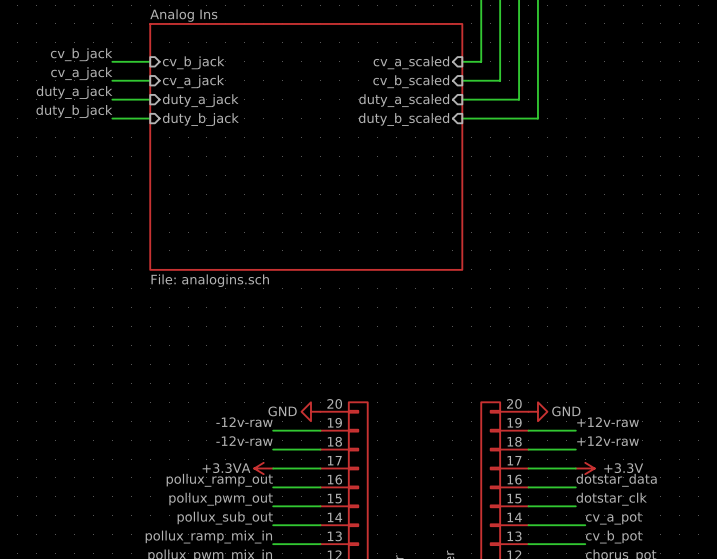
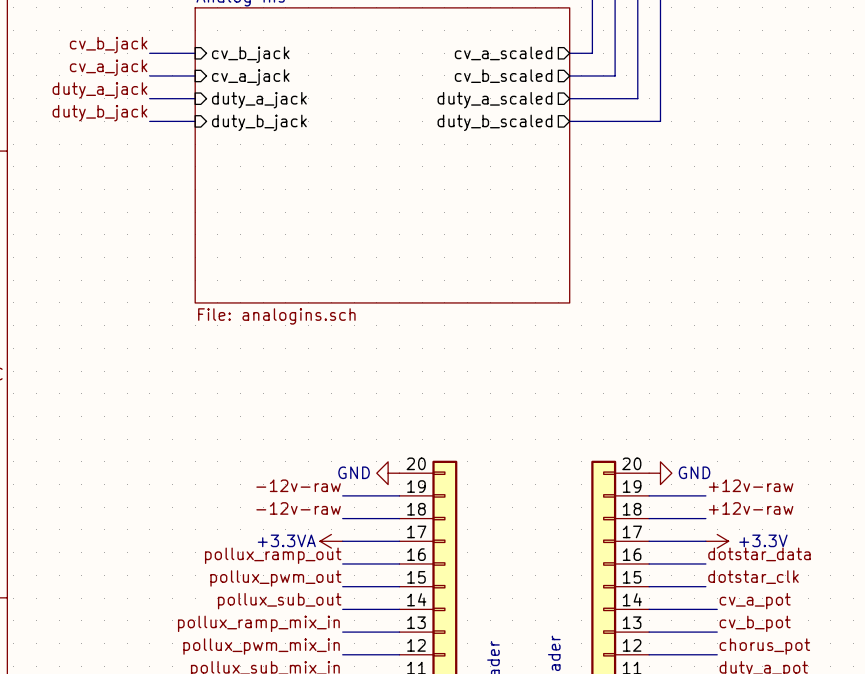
sheet pin shape: input (411, 62) -> output (503, 53)
sheet pin shape: input (411, 81) -> output (503, 76)
sheet pin shape: input (404, 100) -> output (494, 100)
sheet pin shape: input (404, 119) -> output (494, 122)

